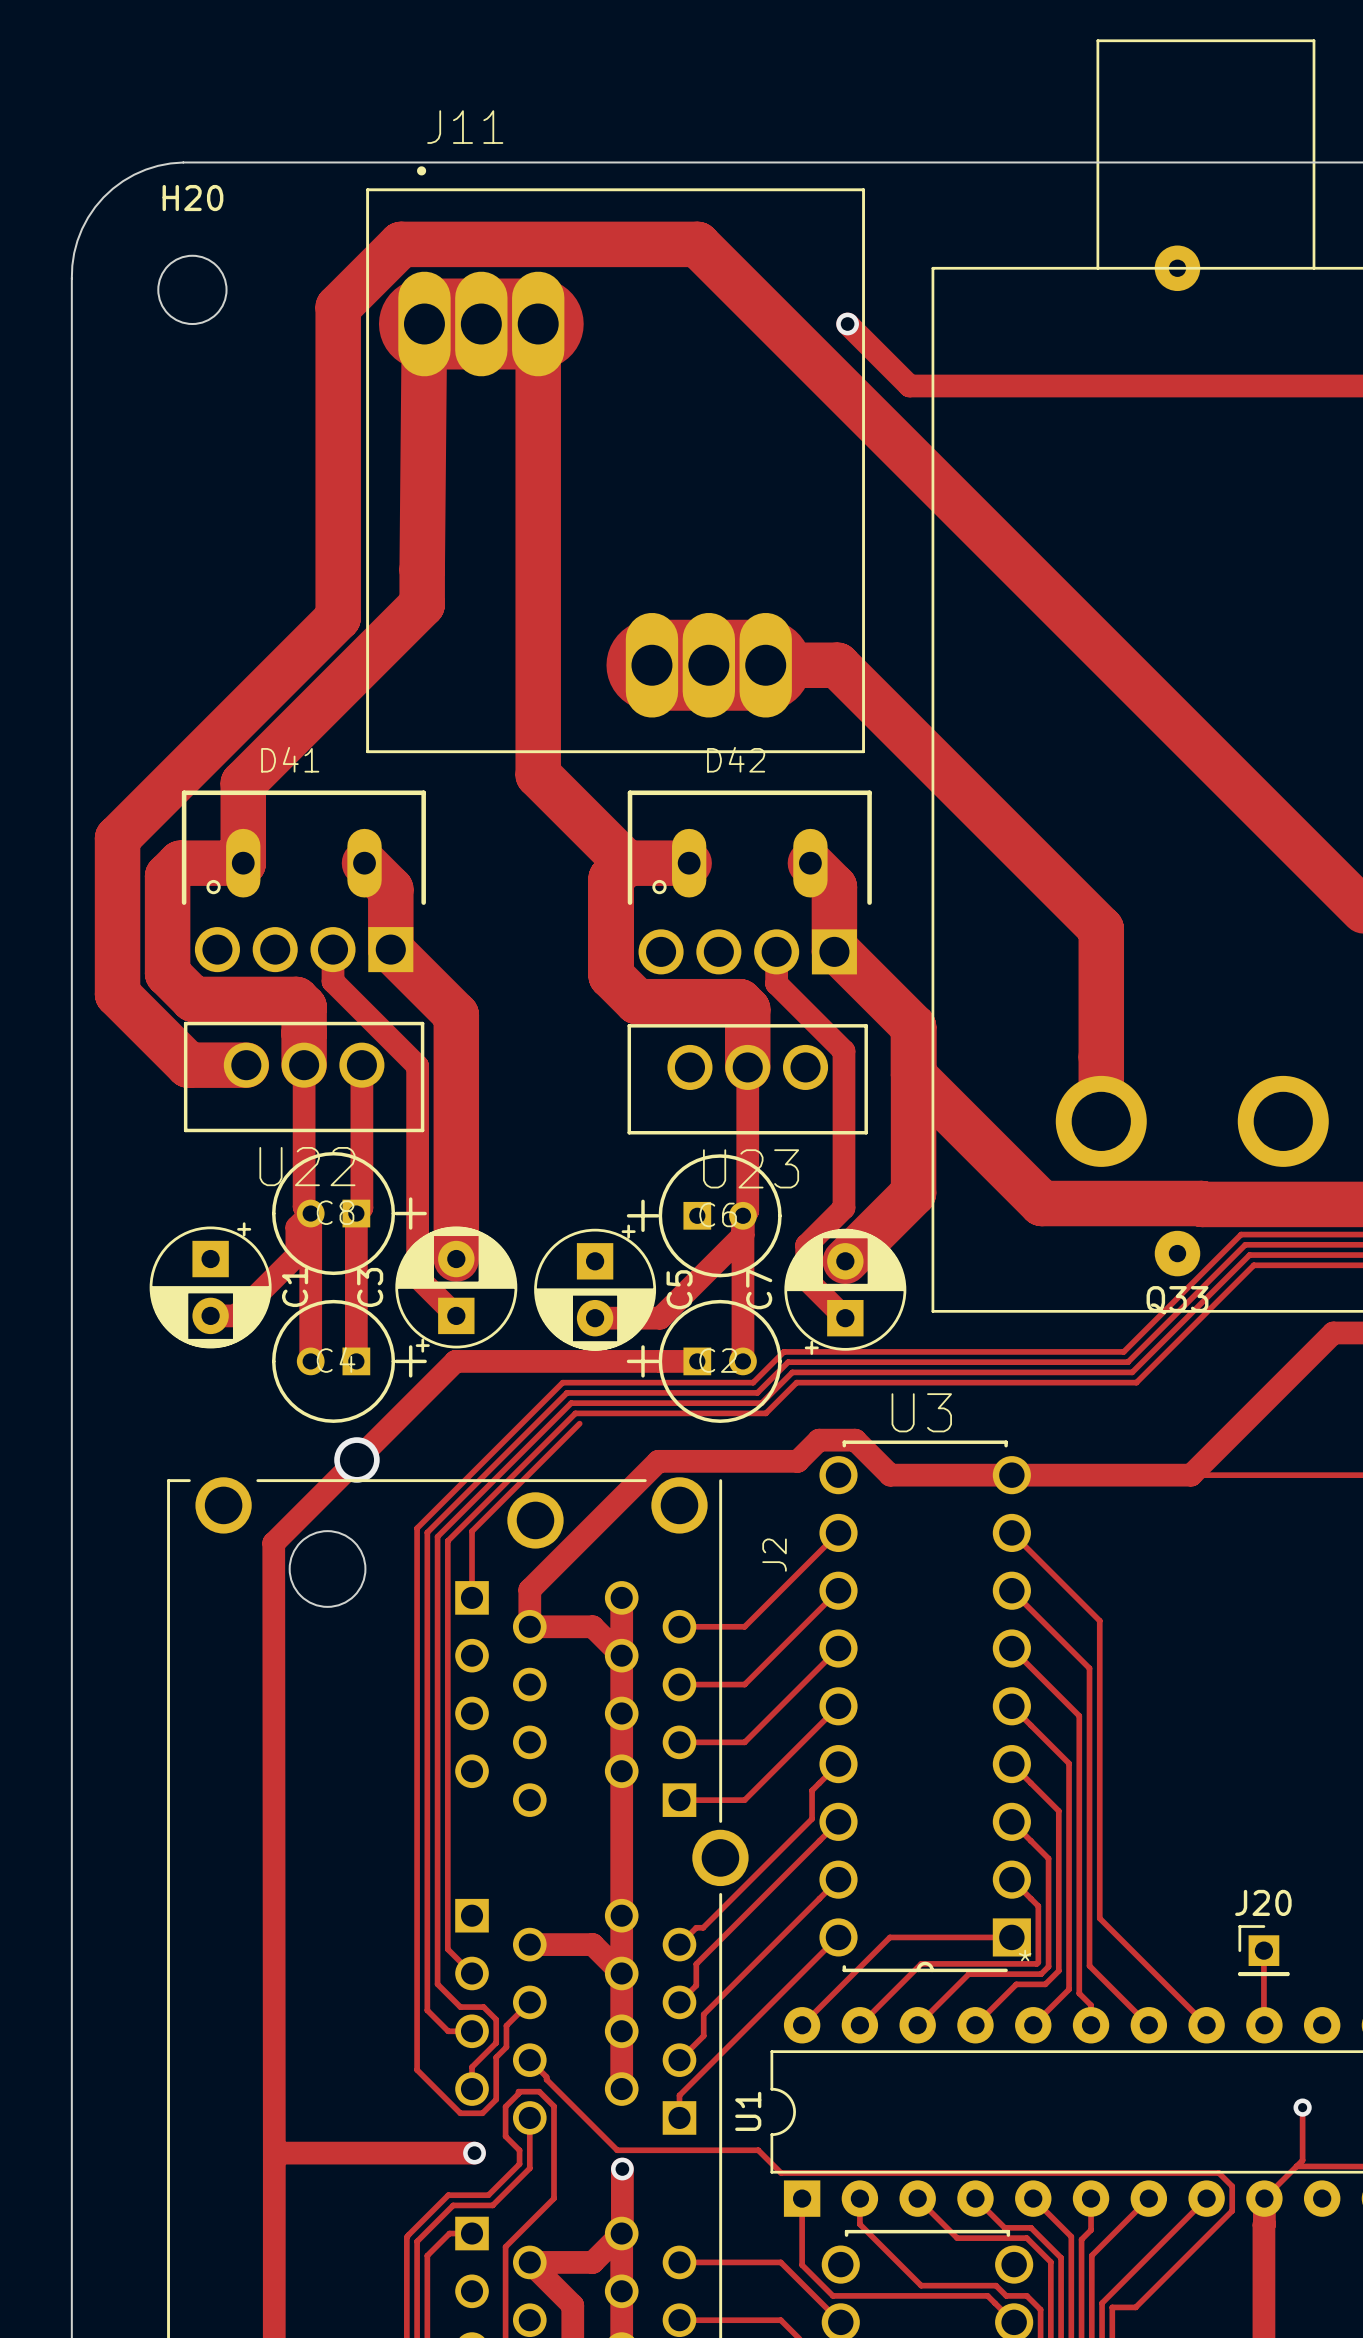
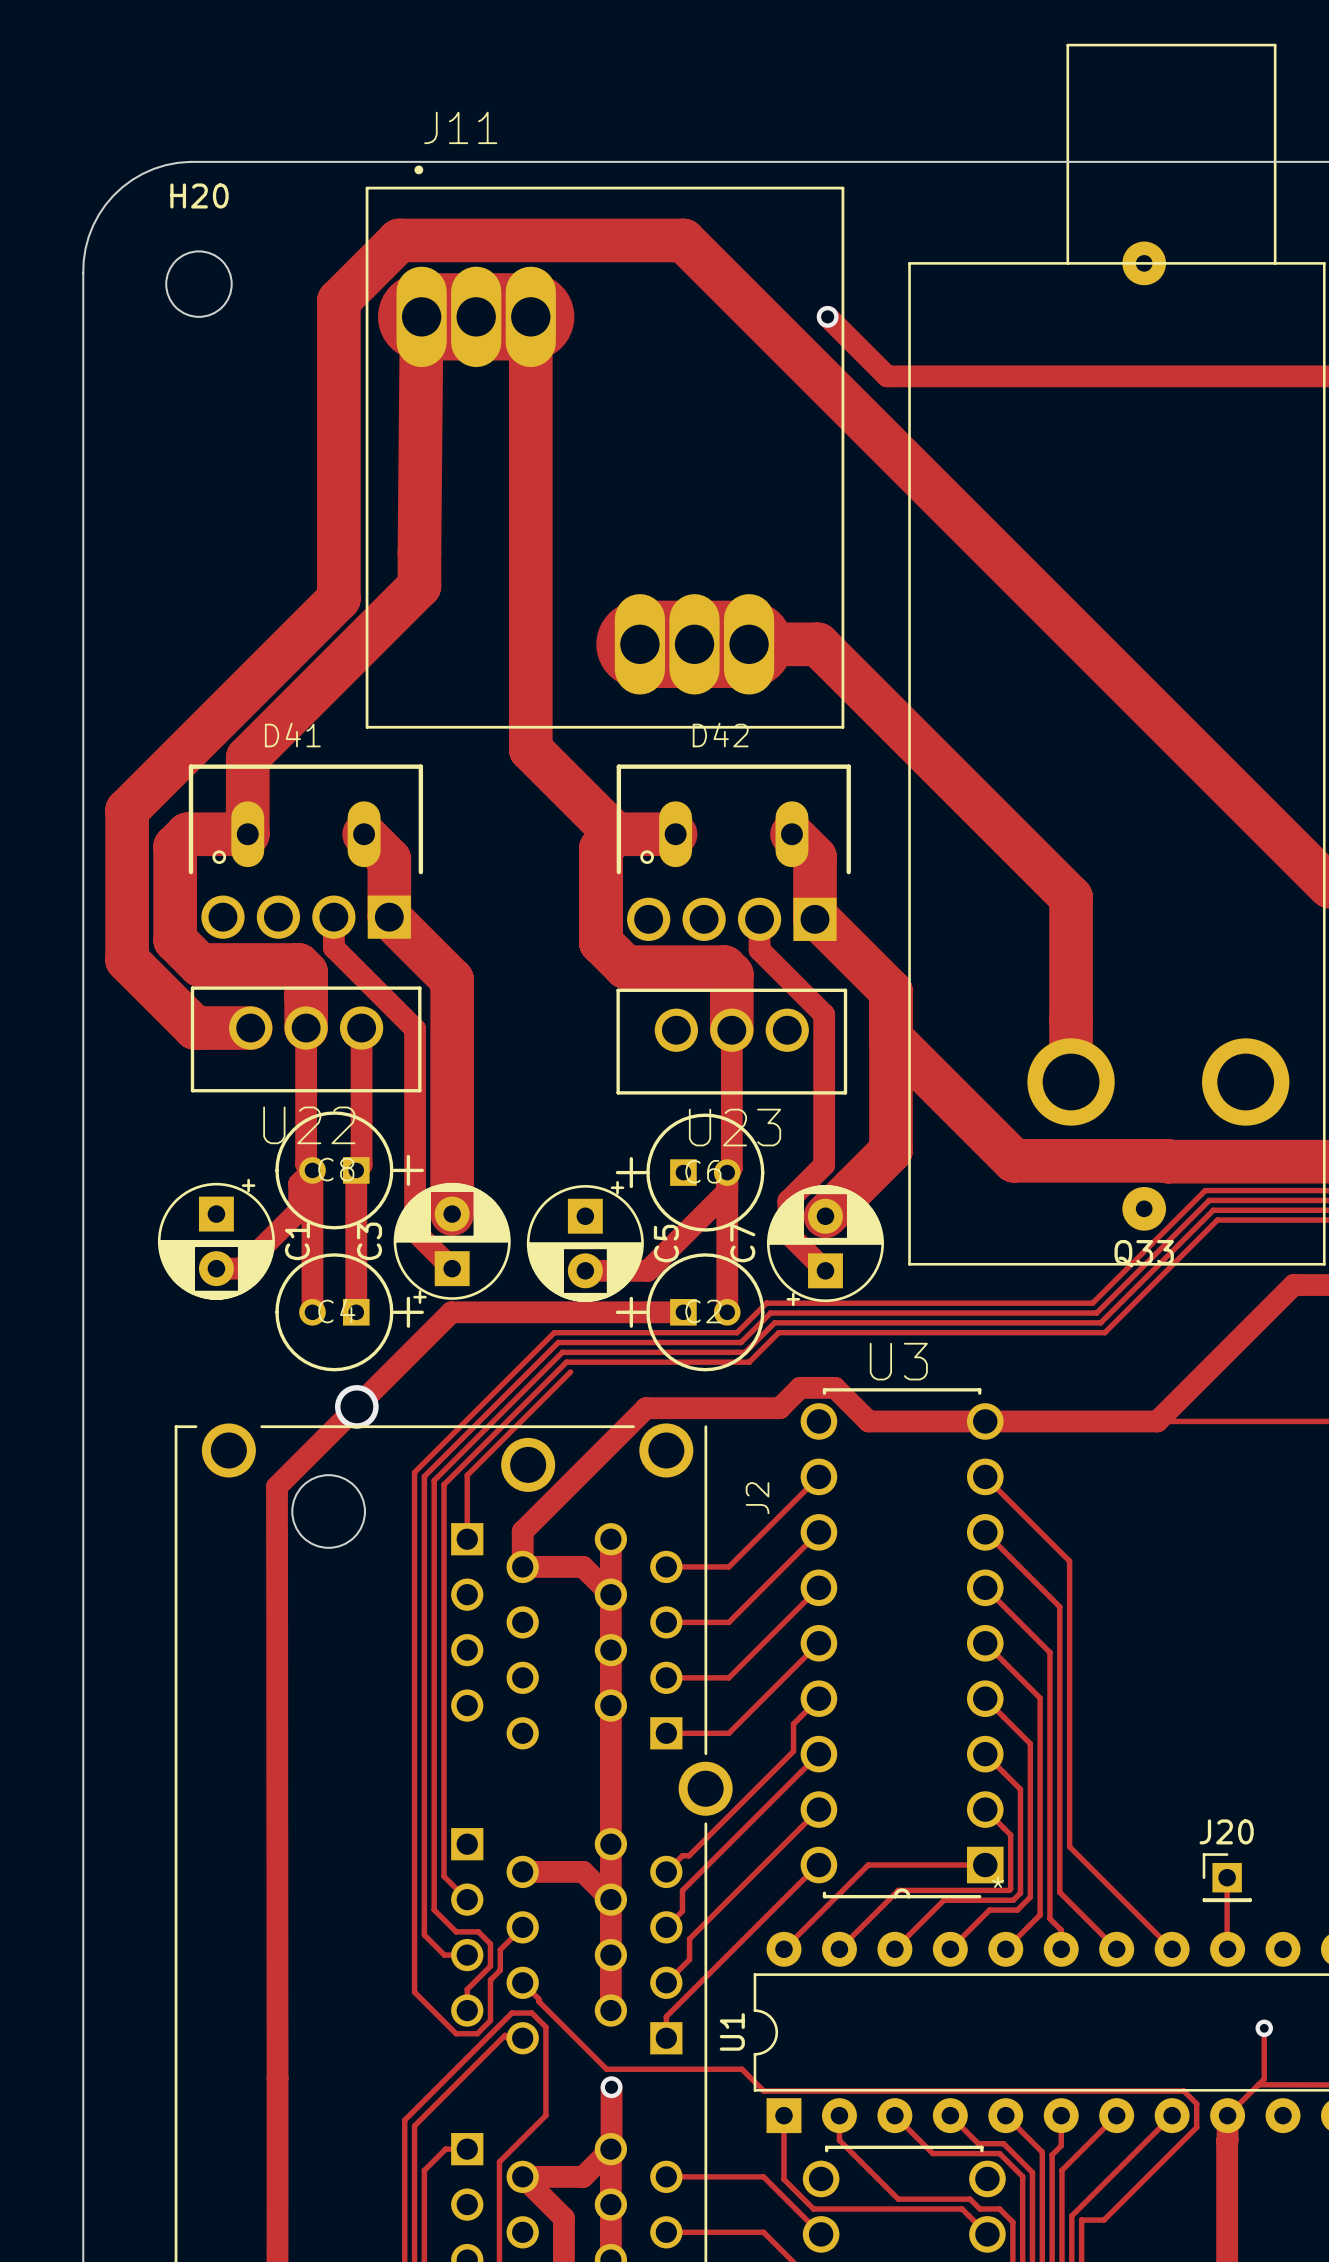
track: (518, 2091) (505, 2106) (505, 2136) (519, 2150) (519, 2164) (488, 2195) (448, 2195) (406, 2237) -> (511, 2013) (404, 2120) (404, 2152)
track: (529, 2117) (529, 2168) (492, 2205) (453, 2205) (417, 2241) -> (522, 2038) (507, 2038) (505, 2035) (414, 2125) (414, 2156)
track: (474, 2153) (281, 2153) (274, 2159) -> none
via: (474, 2153) -> none

